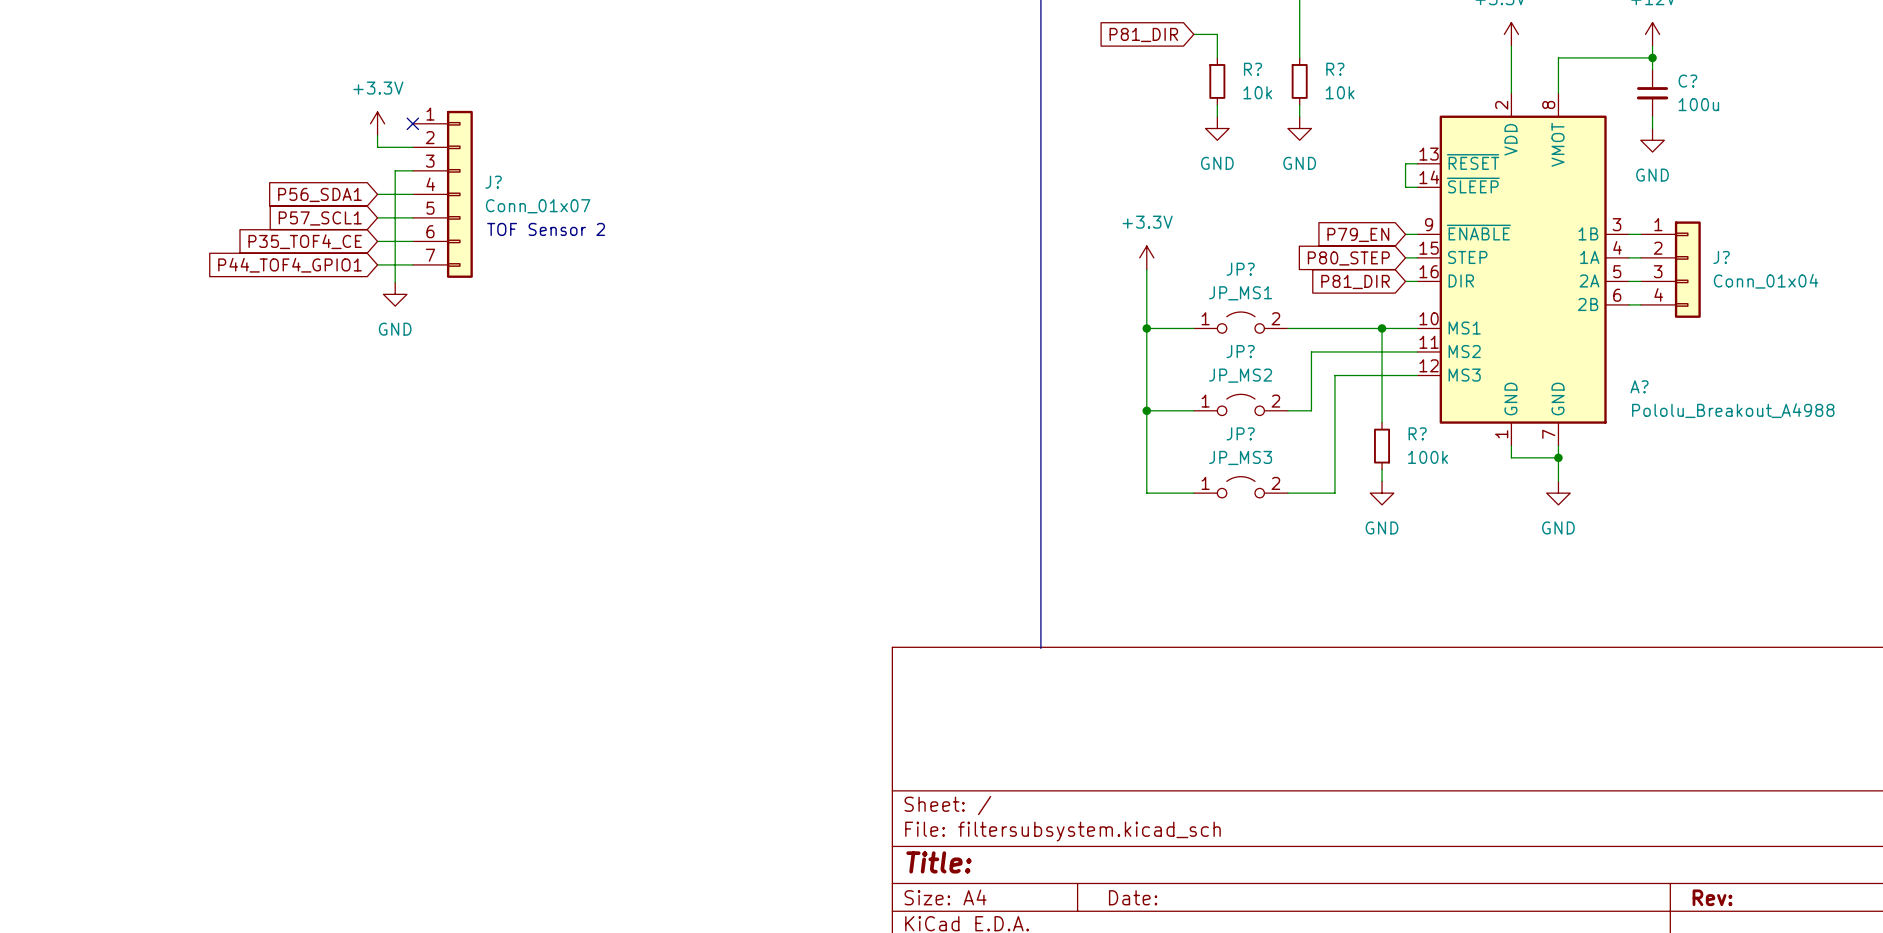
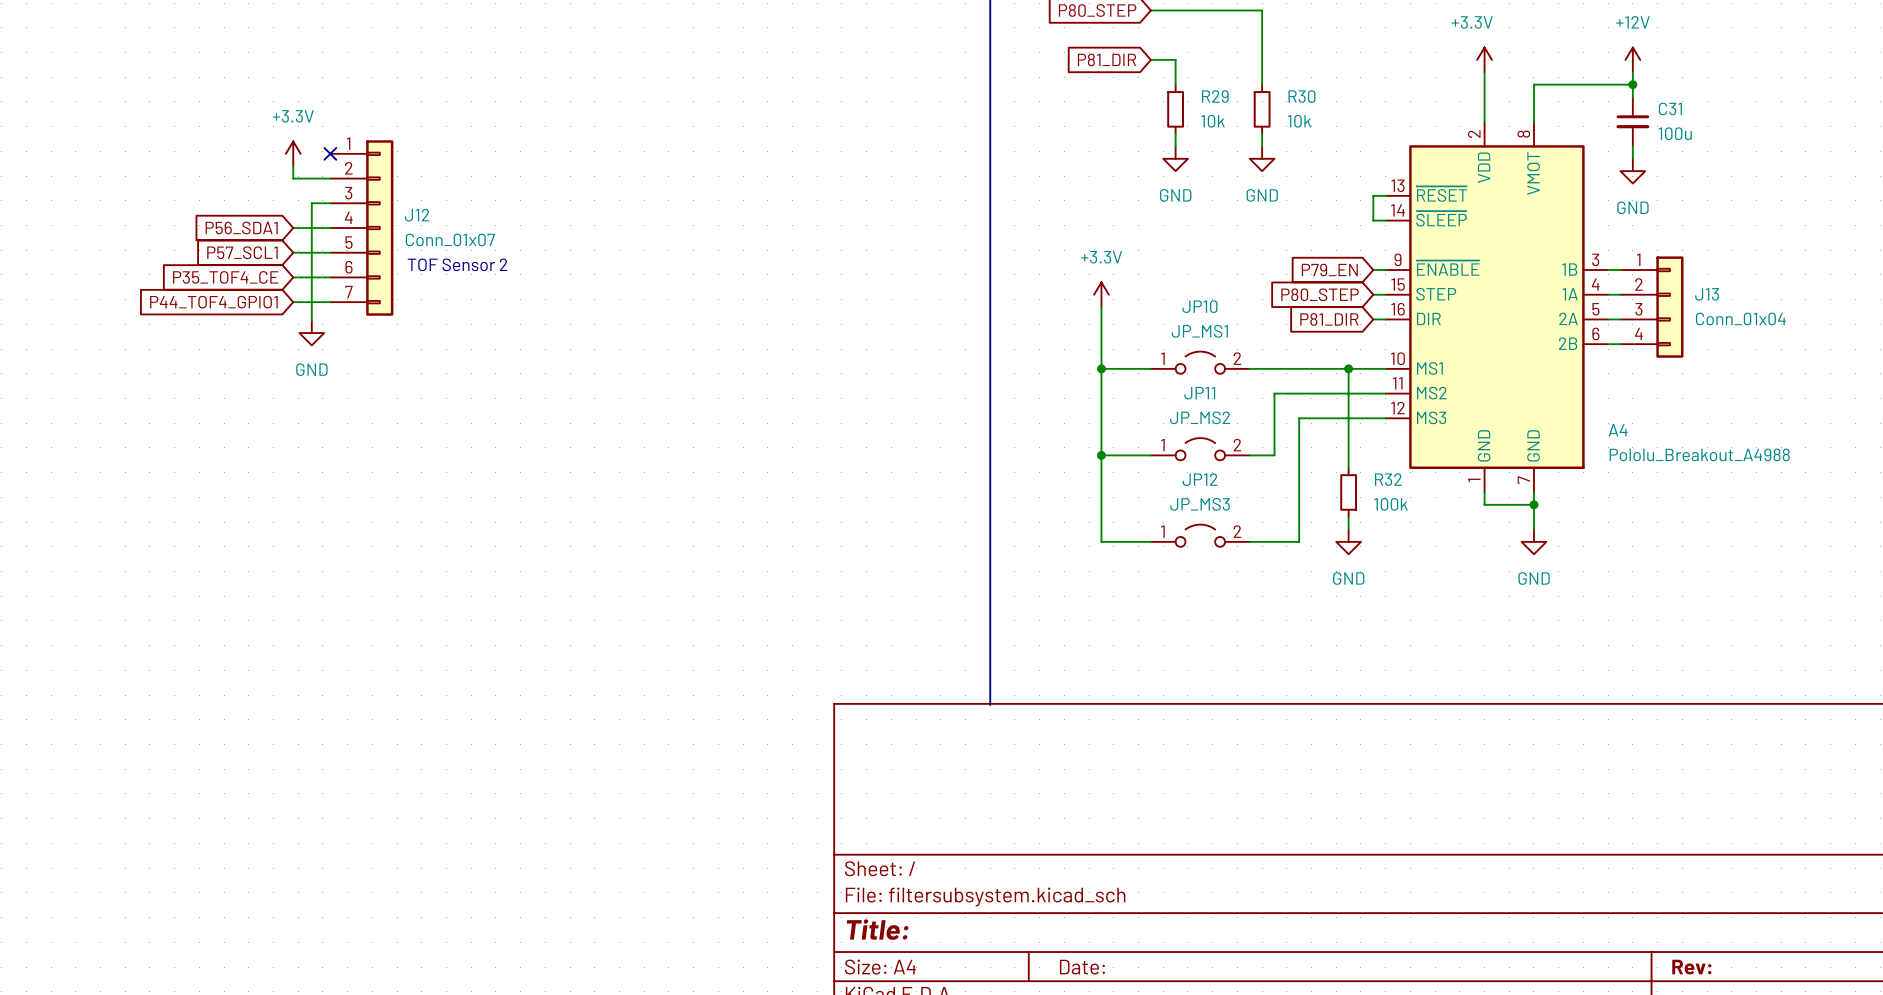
R? name: R? (1253, 69) -> R29 (1215, 96)
R? name: R? (1335, 69) -> R30 (1301, 96)
C? name: C? (1687, 81) -> C31 (1670, 108)
J? name: J? (493, 182) -> J12 (417, 215)
J? name: J? (1721, 257) -> J13 (1707, 294)
JP? name: JP? (1240, 269) -> JP10 (1199, 306)
JP? name: JP? (1240, 351) -> JP11 (1199, 393)
A? name: A? (1639, 386) -> A4 (1618, 430)
JP? name: JP? (1240, 433) -> JP12 (1200, 479)
R? name: R? (1417, 433) -> R32 (1388, 479)

